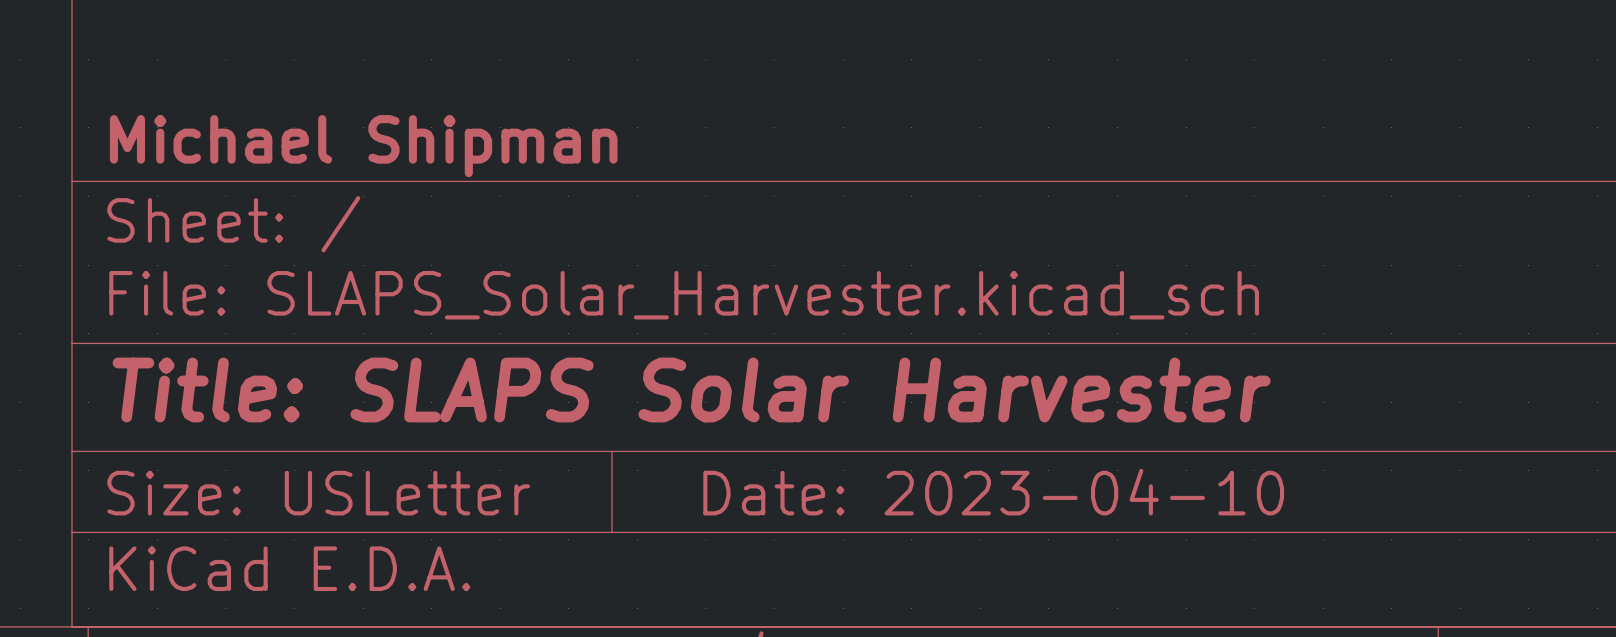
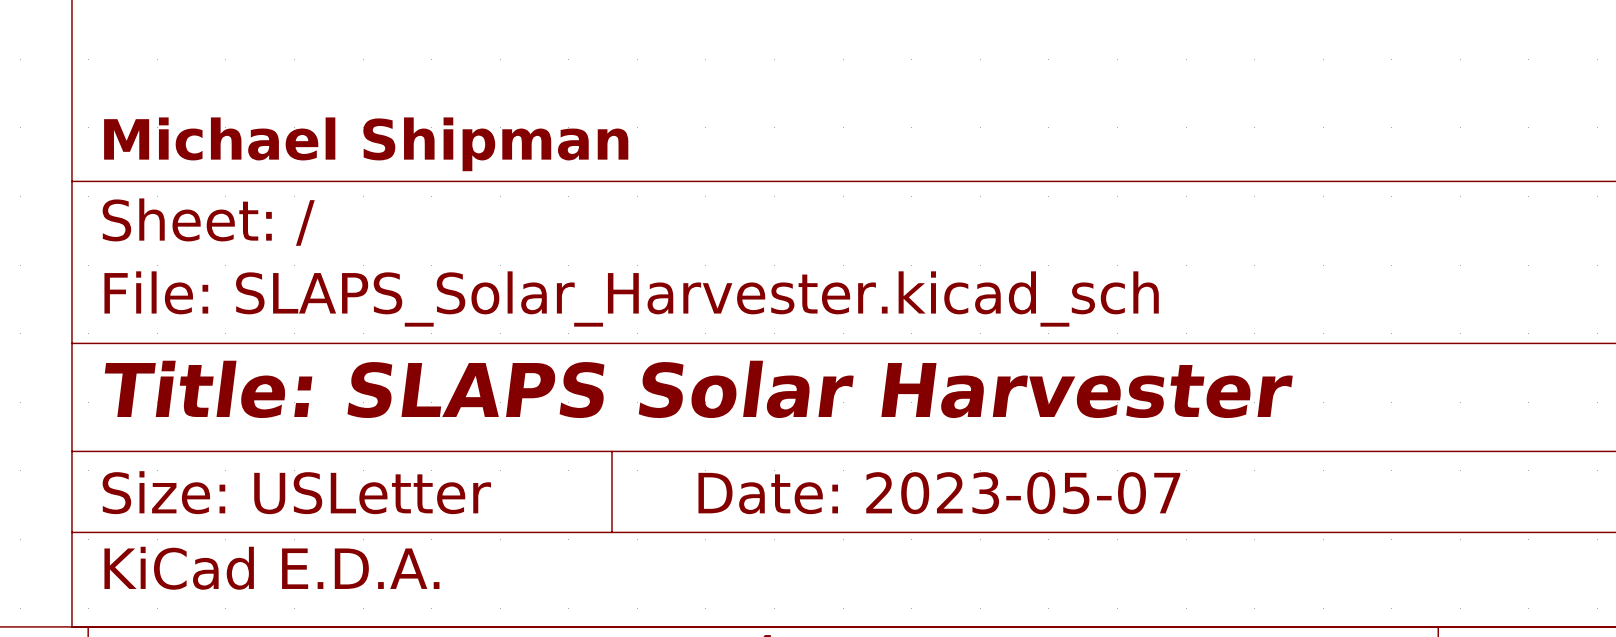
title block: Date: 2023-04-10 (993, 492) -> Date: 2023-05-07 (939, 493)

